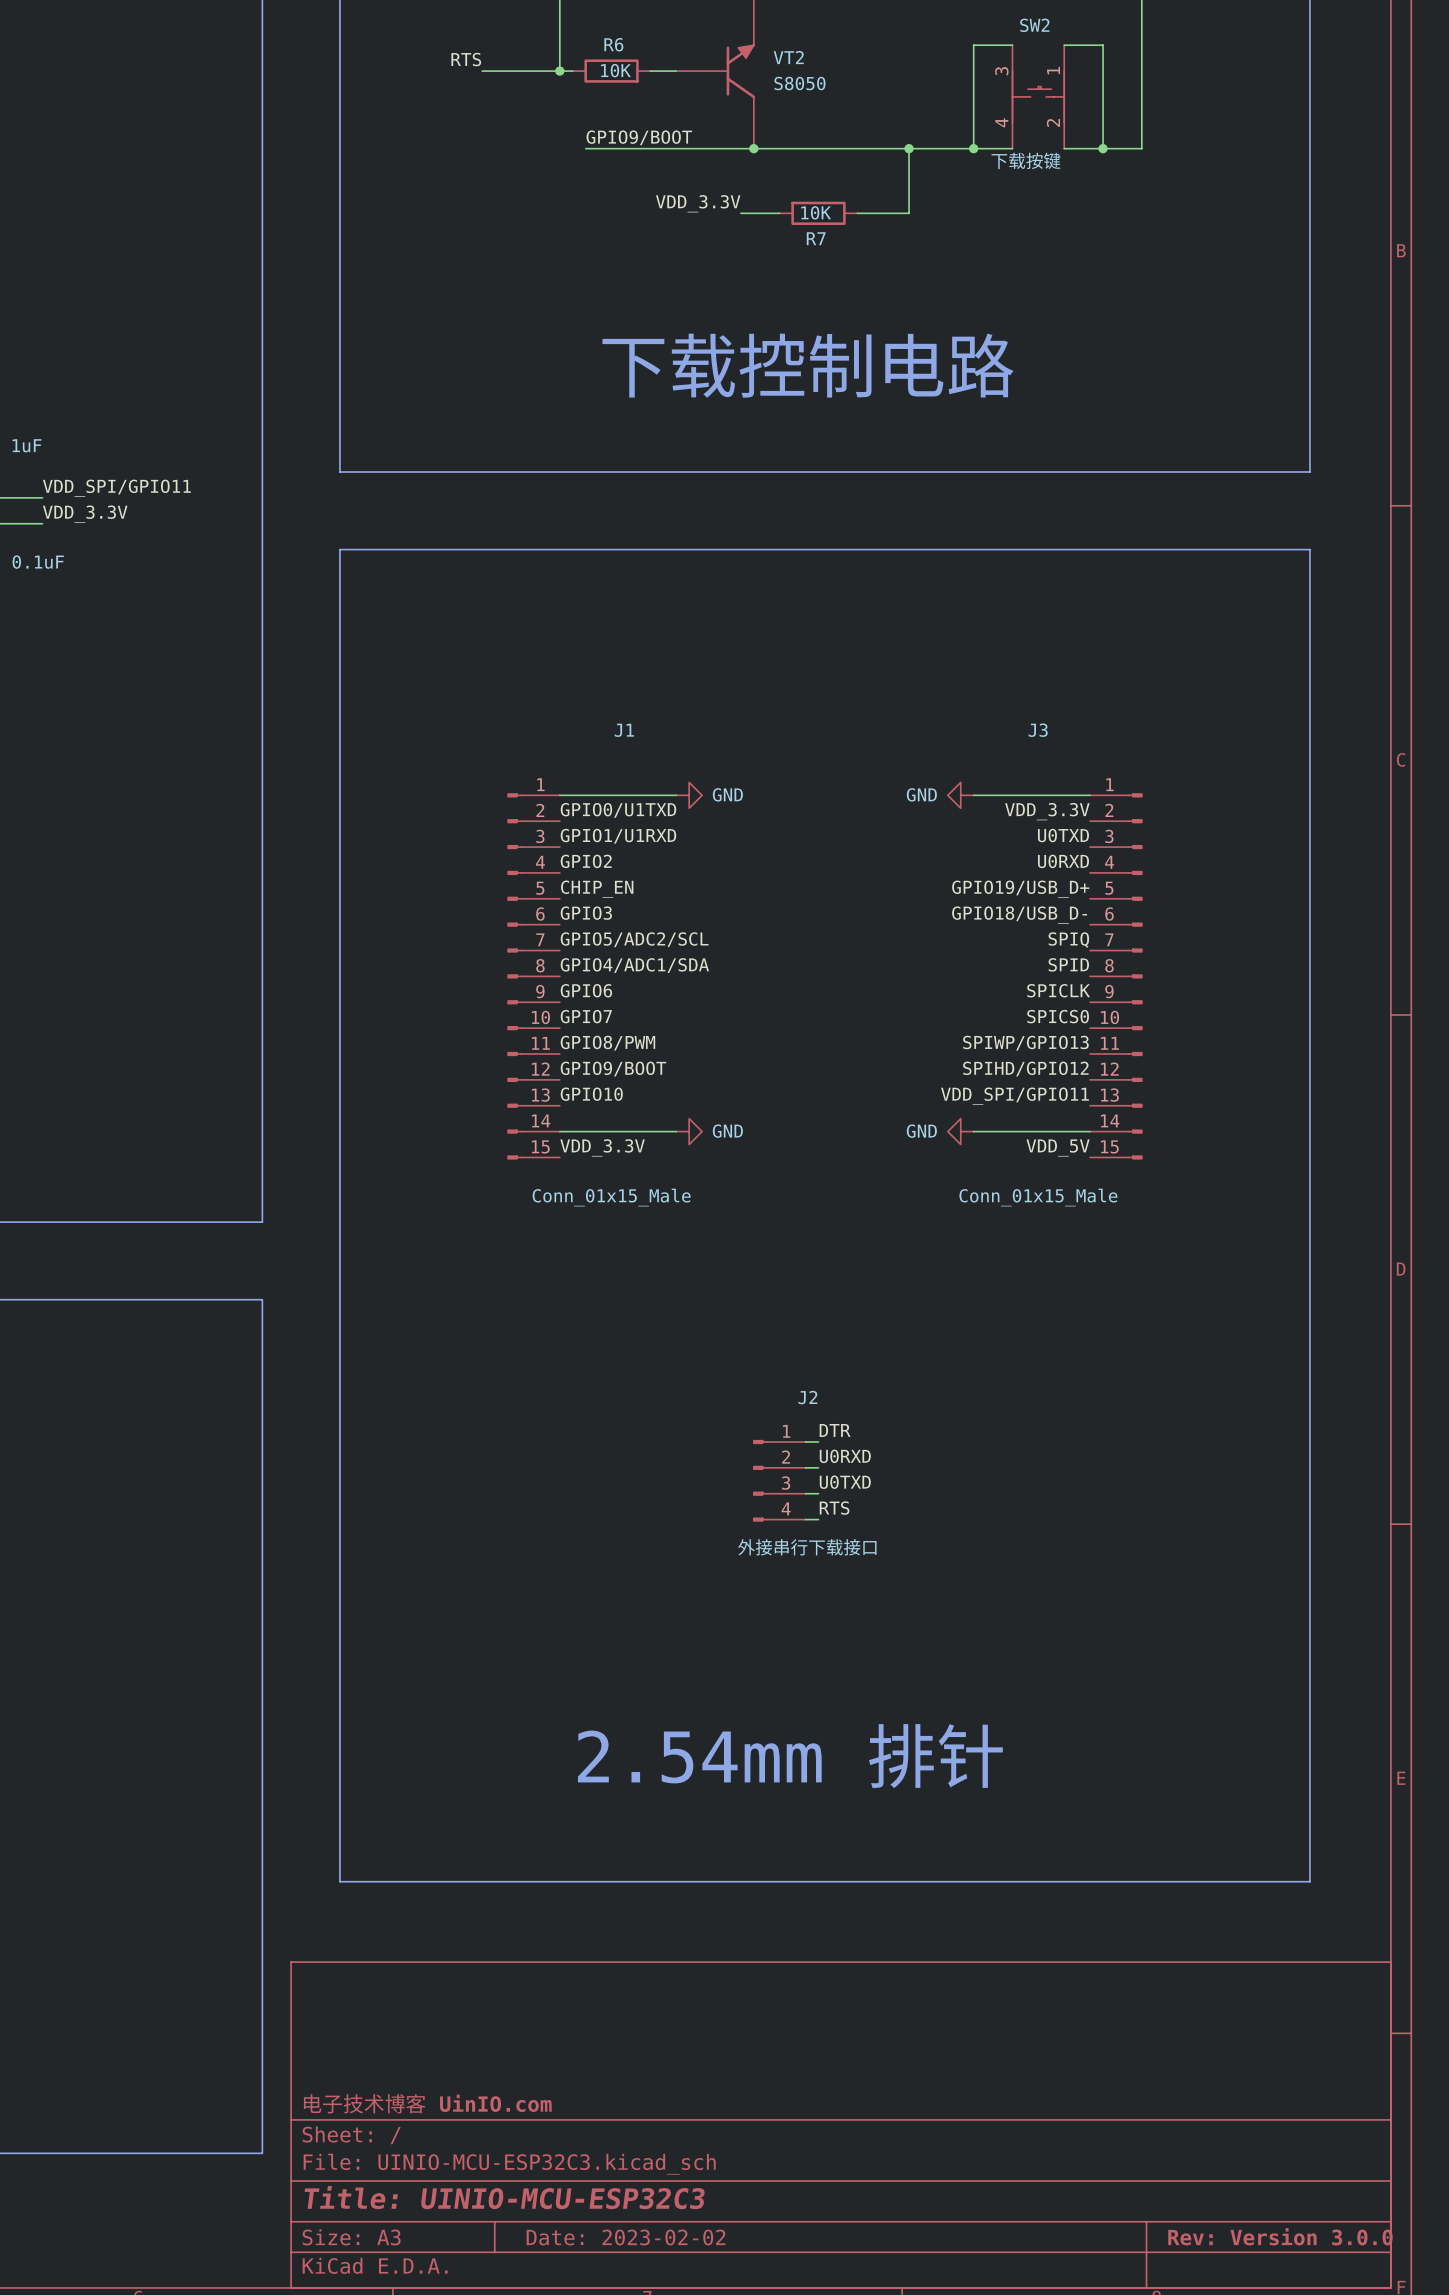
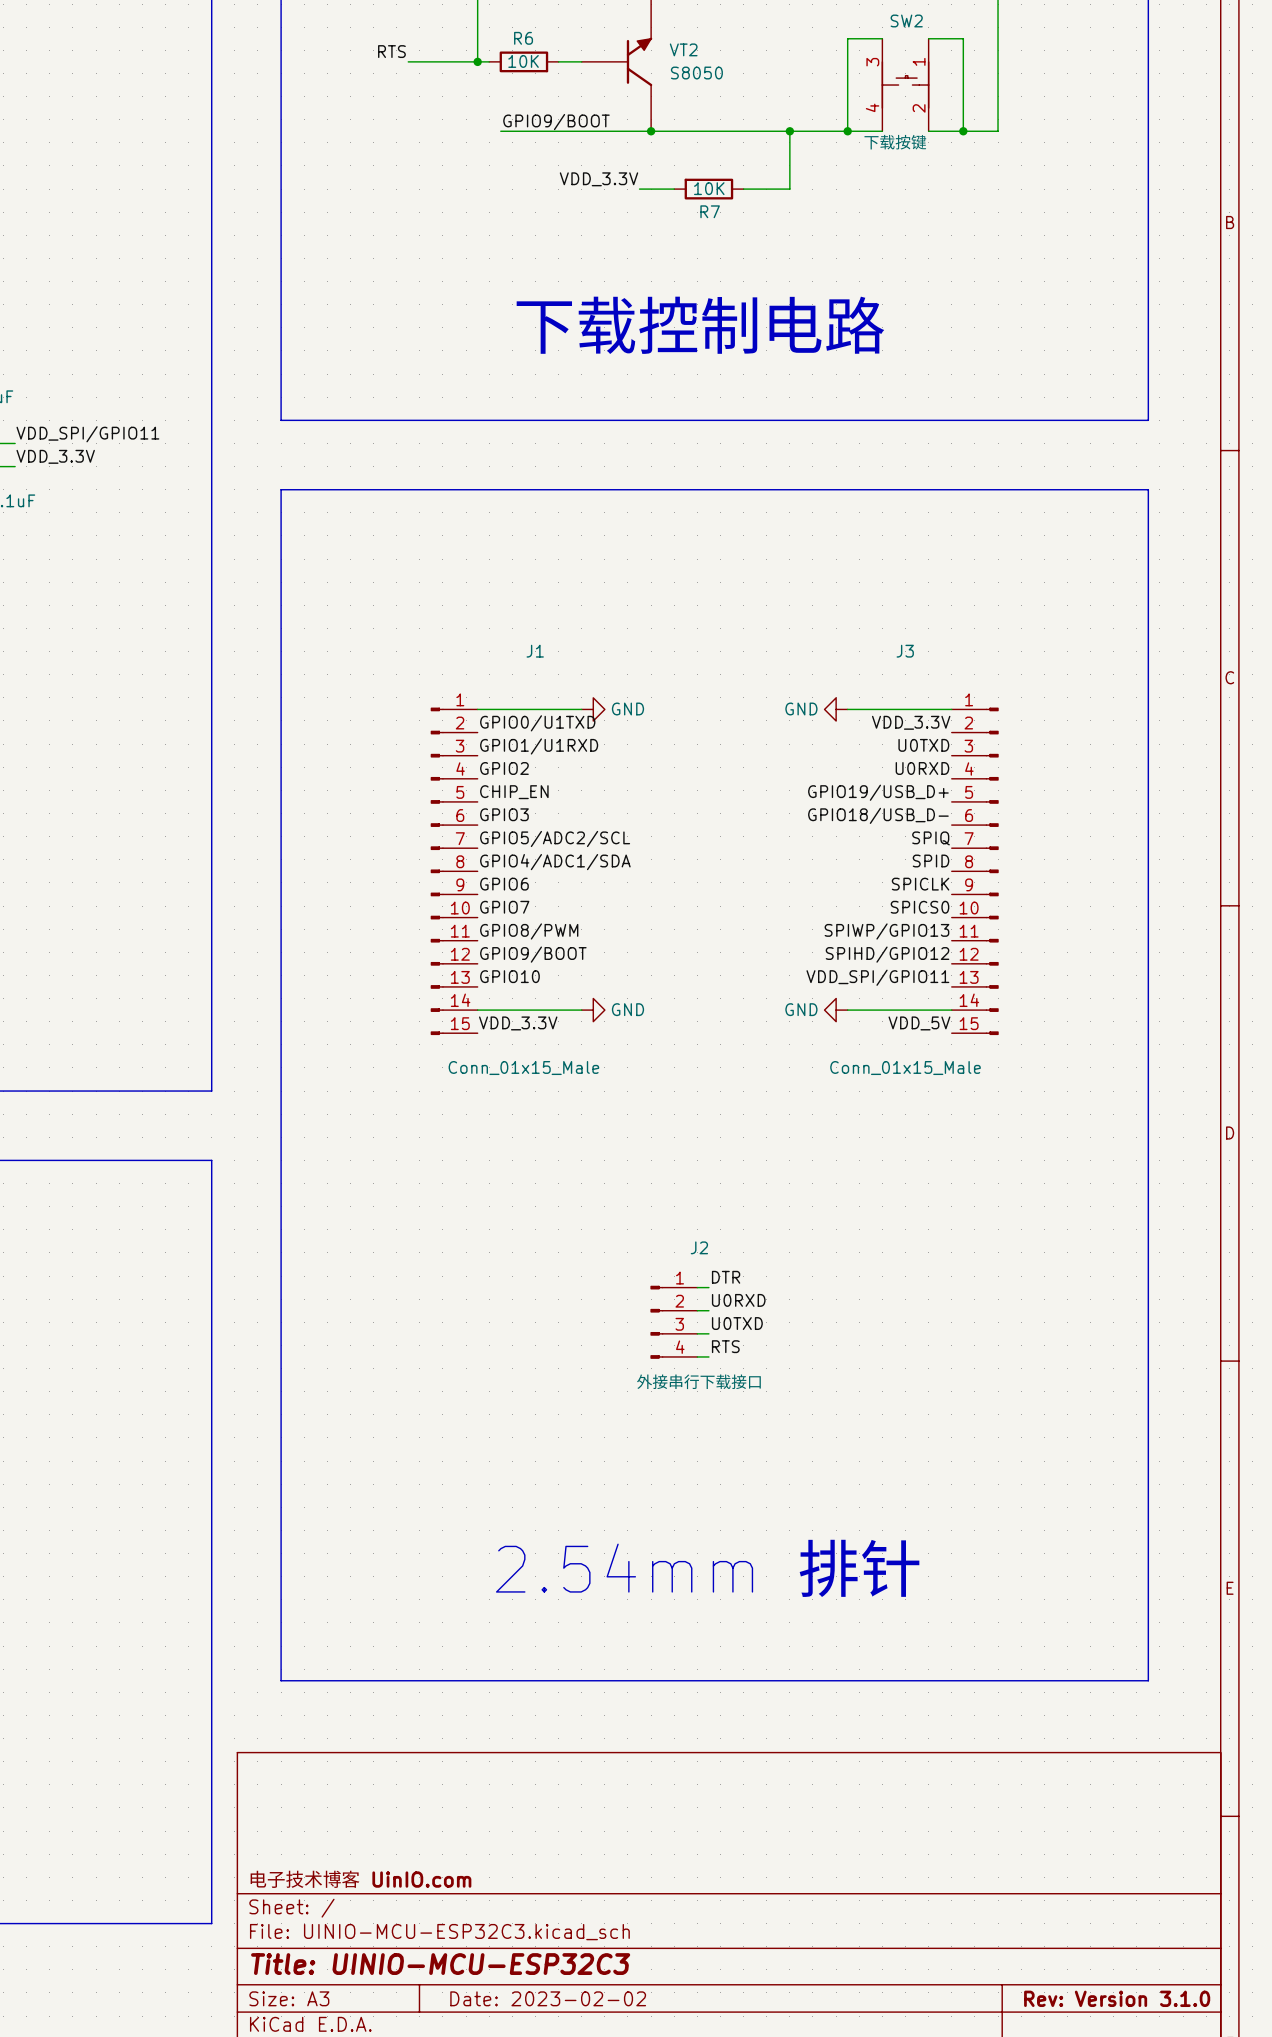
title block: Rev: Version 3.0.0 (1280, 2236) -> Rev: Version 3.1.0 (1117, 1998)

